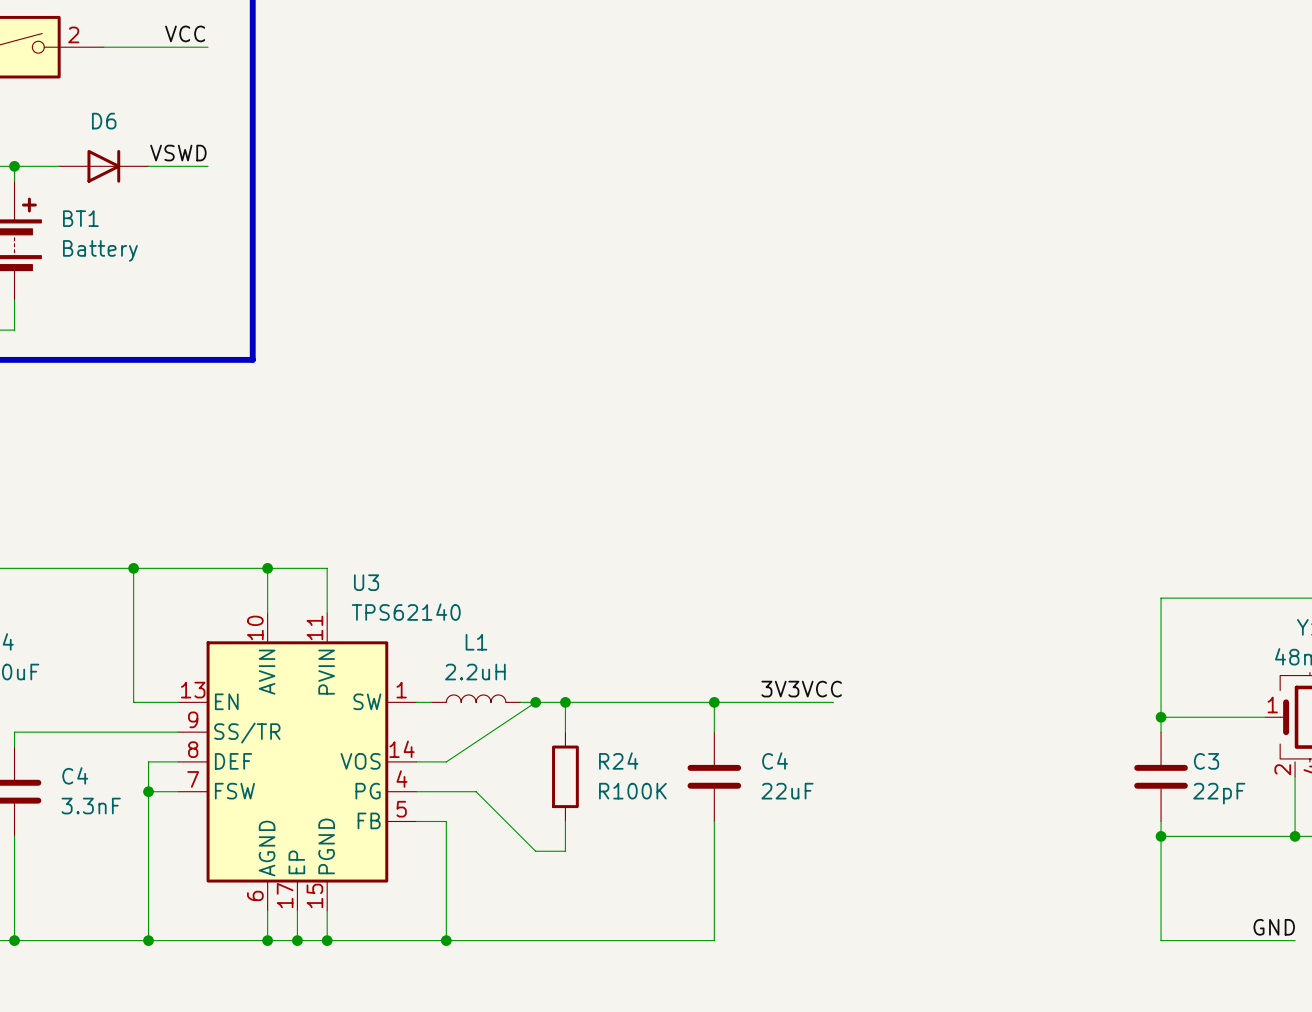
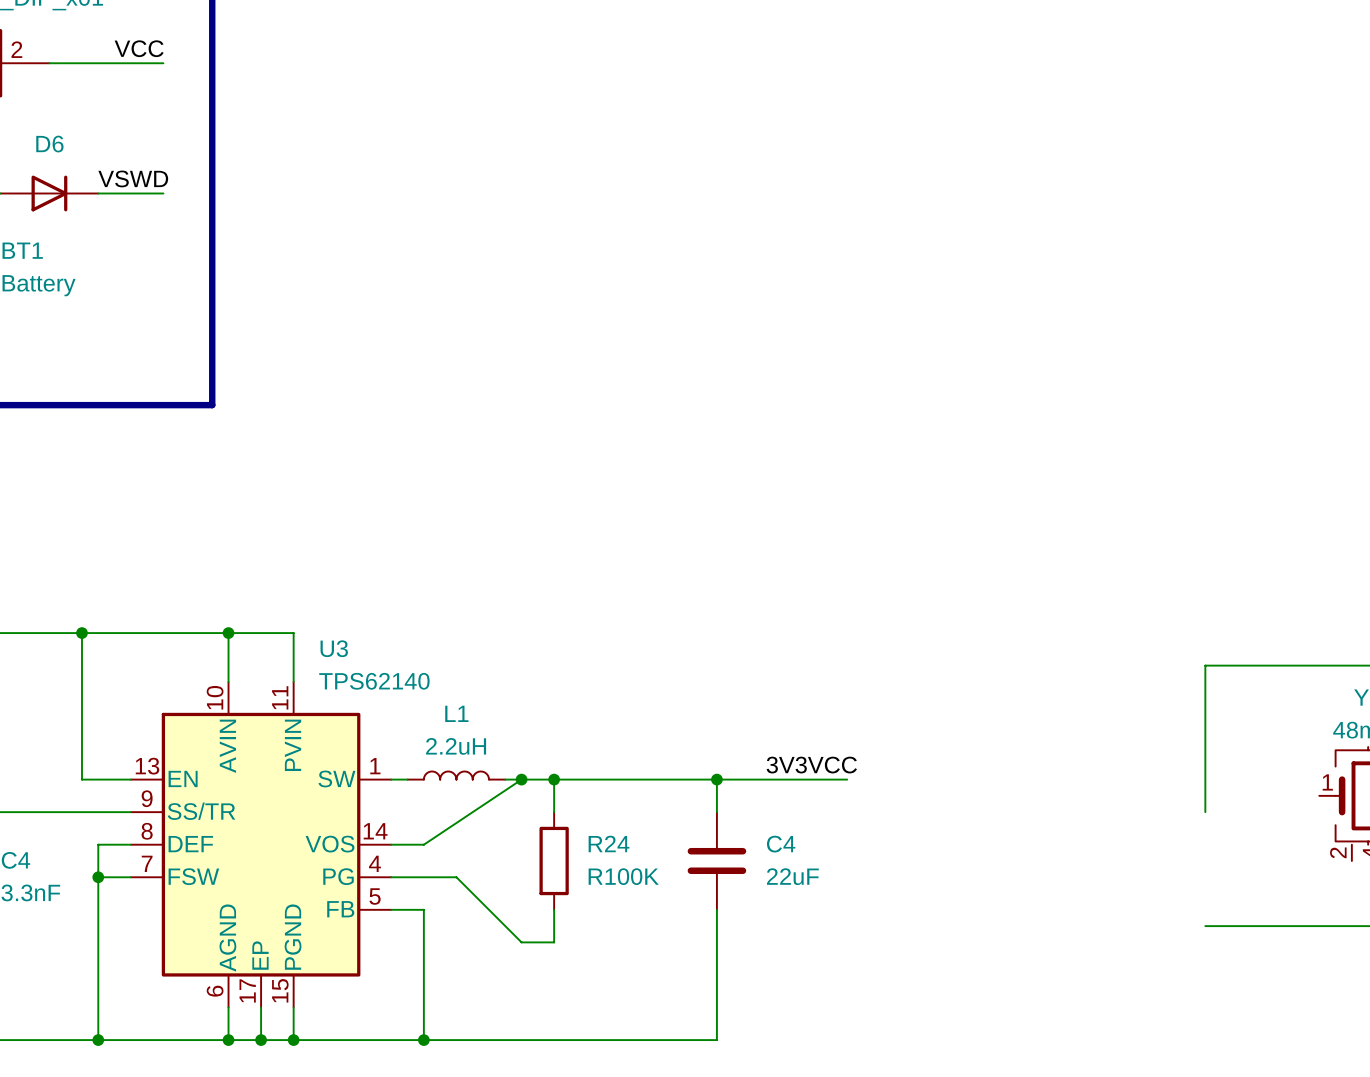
wire: (1161, 717) (1265, 717) -> none
junction: (1161, 717) -> none
C3: 22pF (1161, 776) -> none
wire: (1295, 776) (1295, 836) -> none
wire: (1161, 821) (1161, 940) (1295, 940) -> none
junction: (1161, 836) -> none
junction: (1295, 836) -> none
label: GND (1274, 927) -> none

